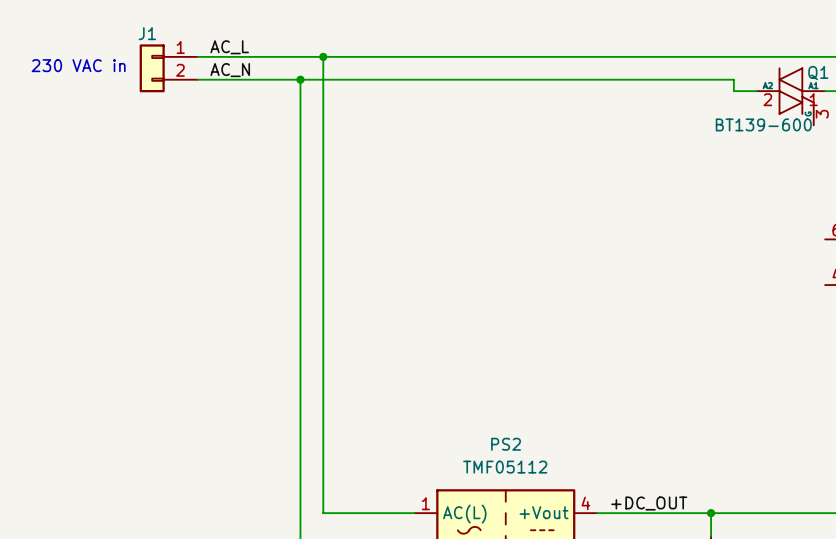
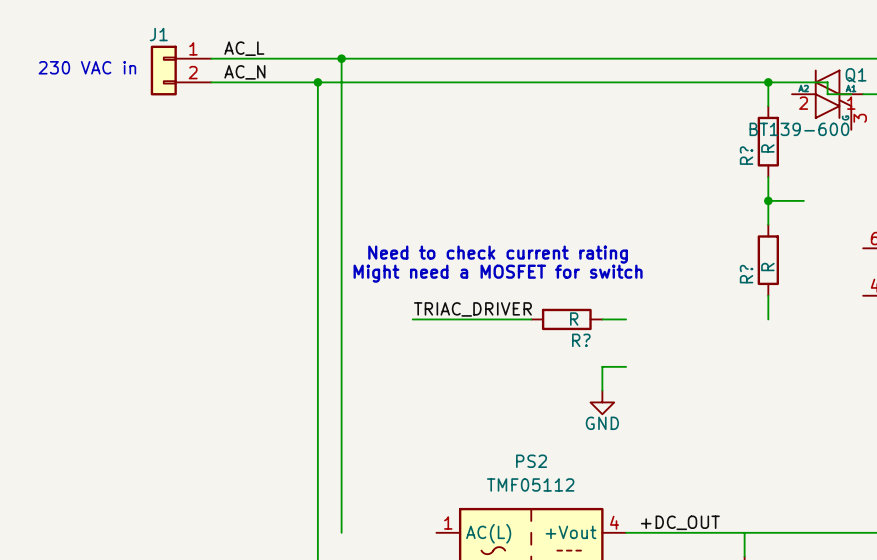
wire: none -> (768, 82) (827, 82) (827, 94) (851, 94)
junction: none -> (768, 82)
wire: (733, 91) (756, 91) -> (768, 94) (768, 106)
R?: none -> R (768, 141)
wire: none -> (768, 177) (768, 224)
wire: none -> (768, 200) (803, 200)
junction: none -> (768, 200)
text: none -> Need to check current rating (498, 254)
R?: none -> R (768, 260)
text: none -> Might need a MOSFET for switch (498, 273)
wire: none -> (768, 295) (768, 319)
label: none -> TRIAC_DRIVER (472, 309)
wire: none -> (412, 319) (531, 319)
R?: none -> R (566, 319)
wire: none -> (602, 319) (626, 319)
wire: none -> (626, 366) (602, 366) (602, 390)
power symbol: none -> GND (602, 402)
wire: (323, 513) (414, 513) -> none
junction: (711, 513) -> none

